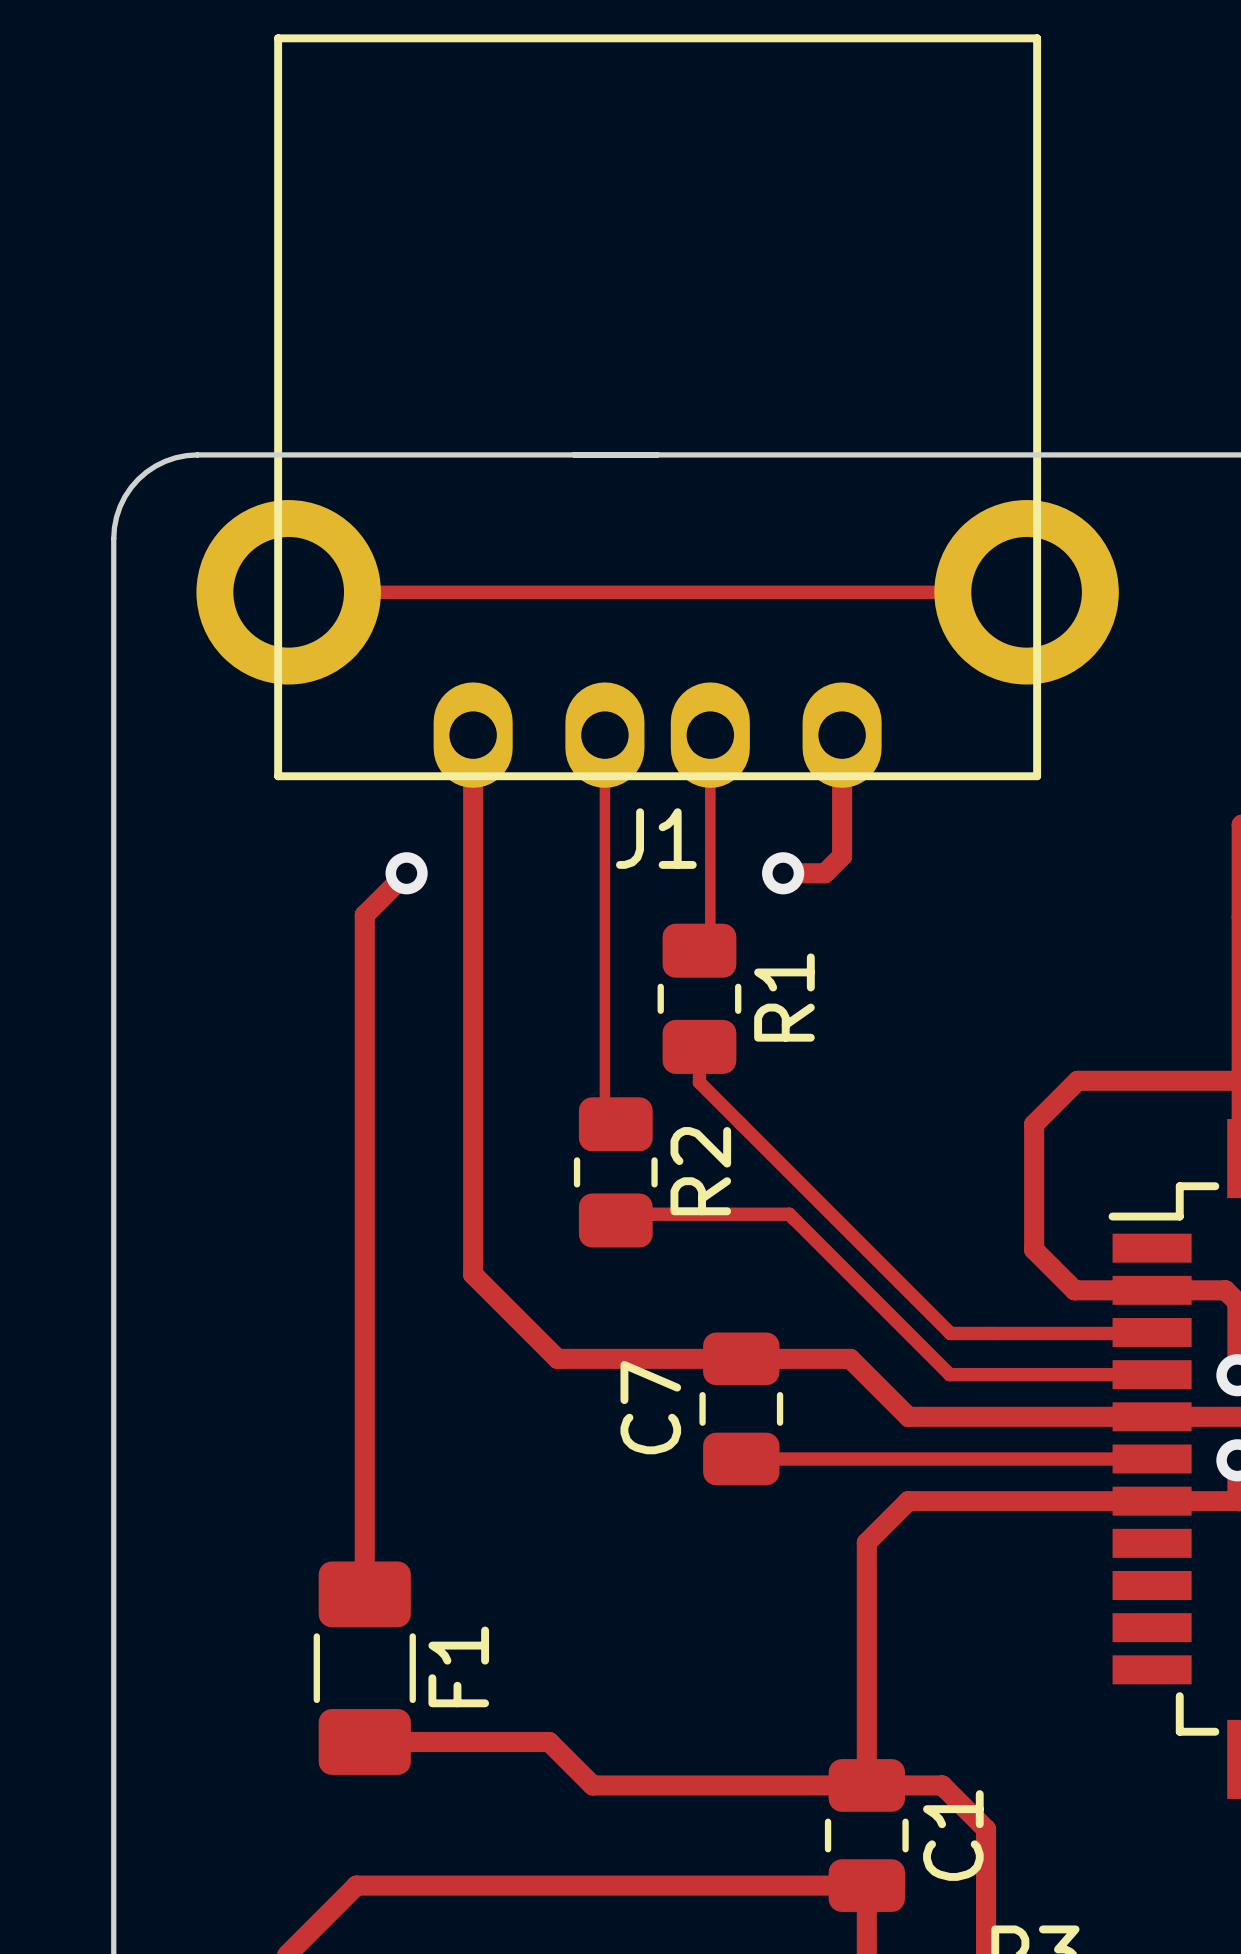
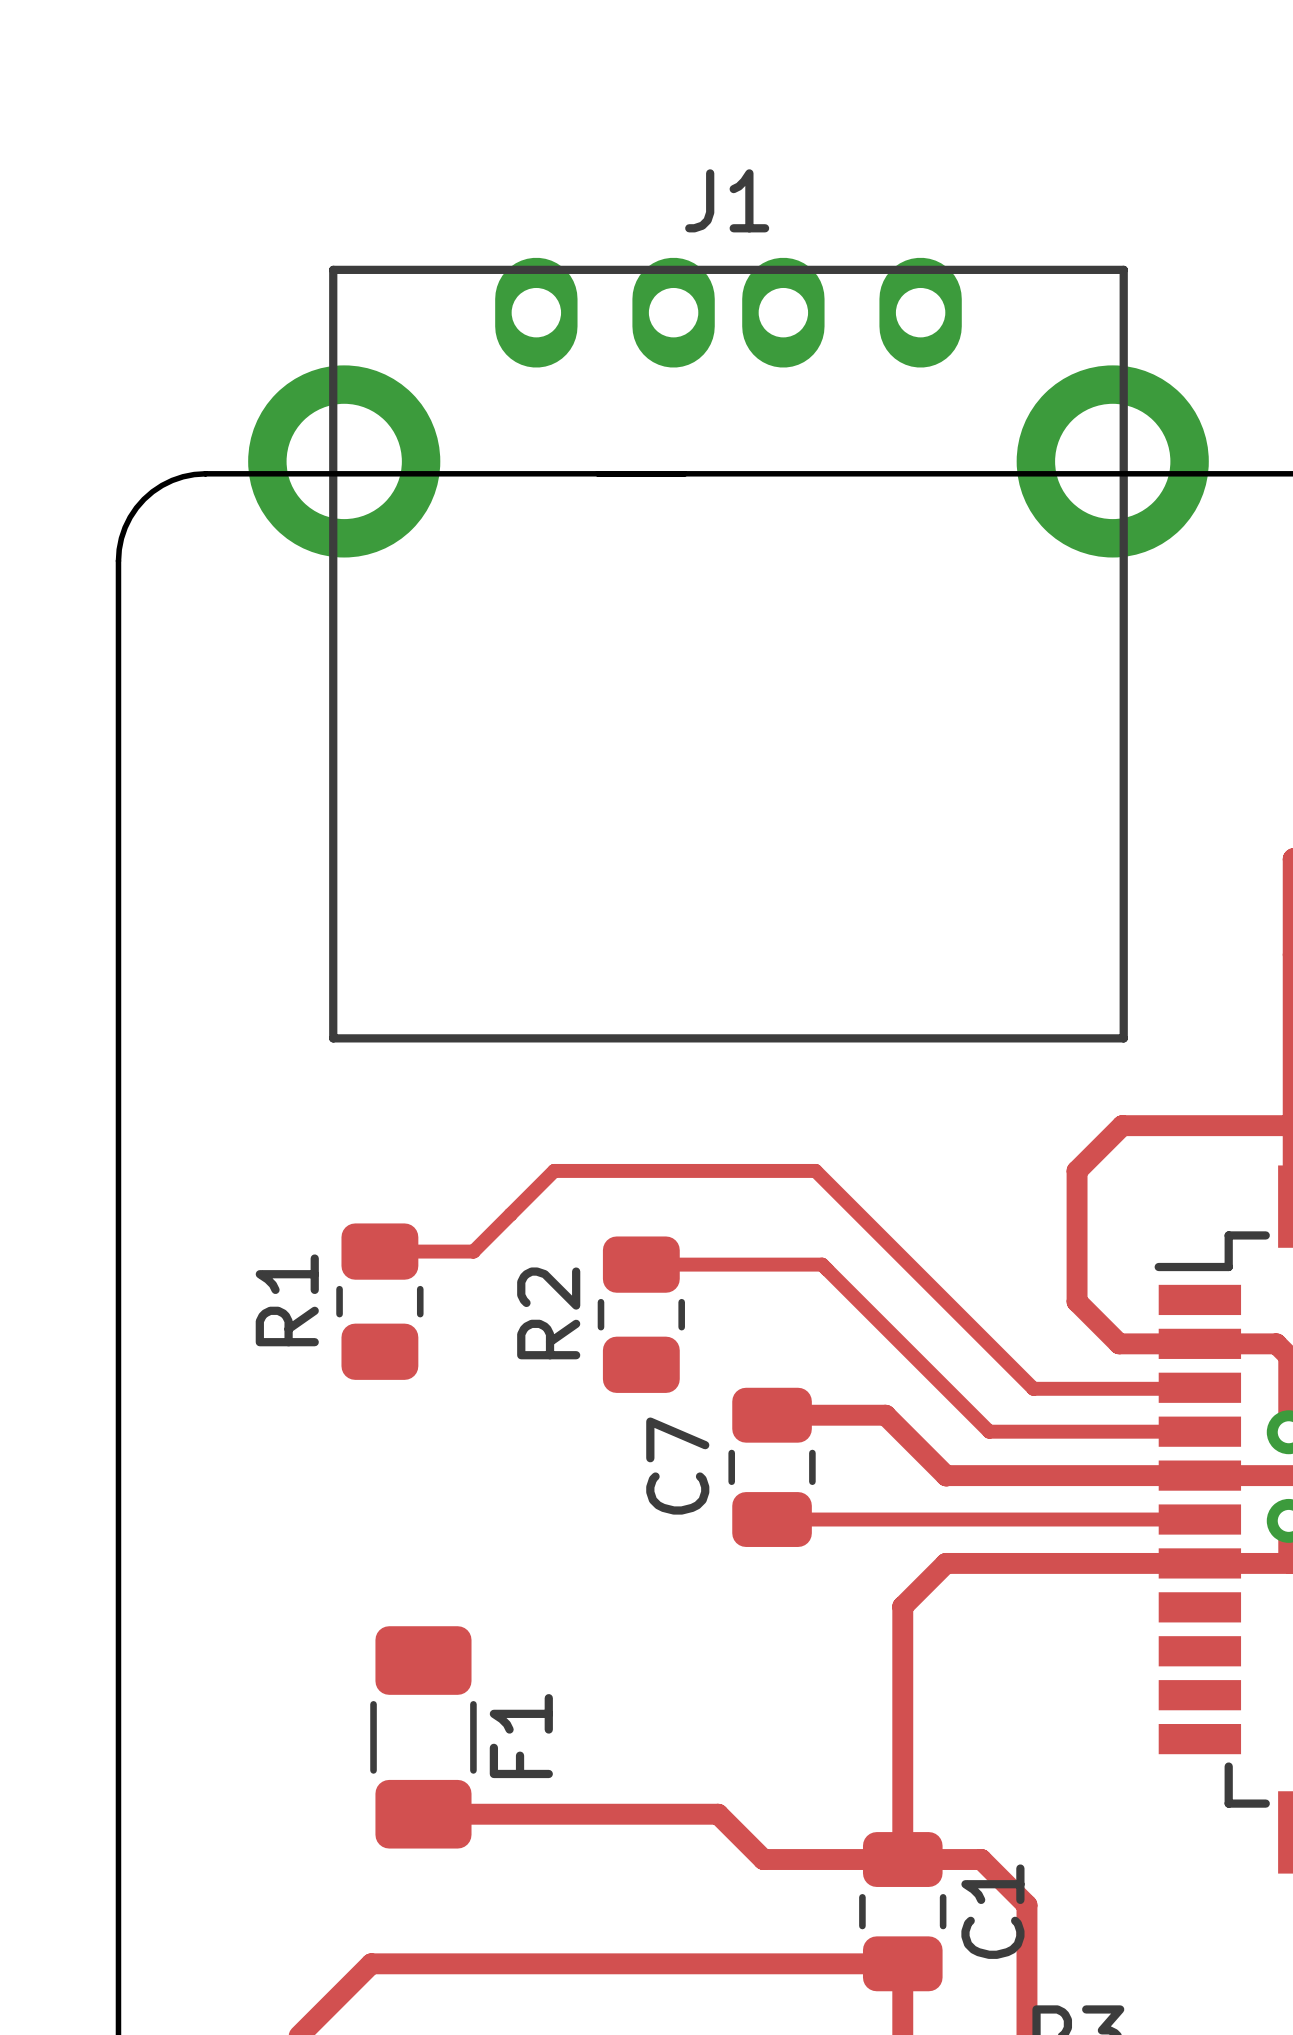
J1 rotation: 0° (657, 411) -> 180° (728, 650)
track: (288, 592) (1026, 592) -> none
track: (473, 735) (473, 1274) (557, 1358) (741, 1358) -> none
track: (604, 735) (604, 1113) (615, 1124) -> none
track: (710, 735) (710, 946) (699, 956) (699, 950) -> none
track: (842, 735) (842, 856) (824, 873) (783, 873) -> none
track: (406, 873) (364, 915) (364, 1594) -> none
via: (406, 873) -> none
via: (783, 873) -> none
R1 name position: R1 (784, 997) -> R1 (287, 1300)
R1 position: (699, 998) -> (379, 1301)
track: (699, 1046) (699, 1082) (950, 1333) (992, 1333) -> (379, 1251) (473, 1251) (554, 1170) (815, 1170) (1033, 1388)
R2 name position: R2 (700, 1171) -> R2 (548, 1313)
R2 position: (615, 1172) -> (641, 1314)
F1 position: (364, 1668) -> (423, 1737)
track: (549, 1741) (592, 1785) (733, 1785) -> (572, 1814) (718, 1814) (763, 1859)

